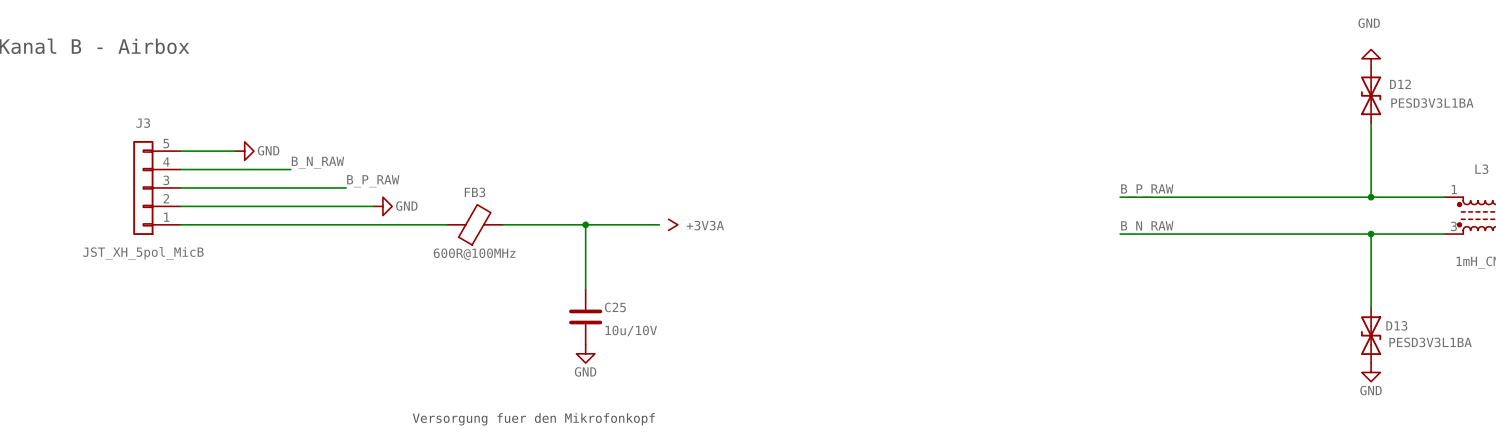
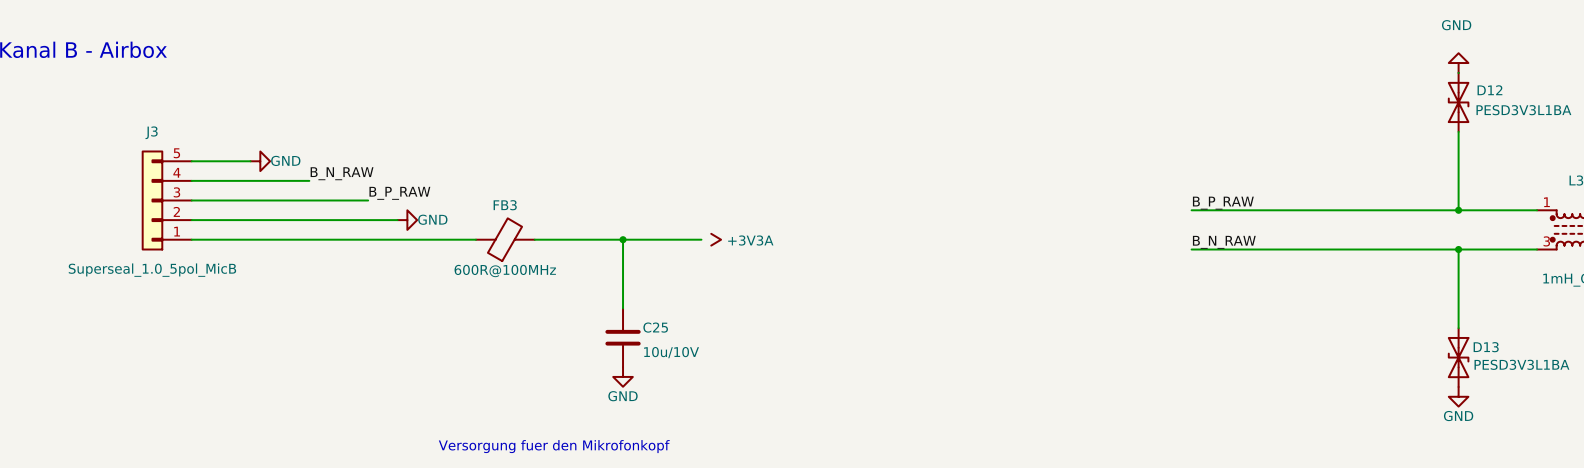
J3 value: JST_XH_5pol_MicB (143, 253) -> Superseal_1.0_5pol_MicB (152, 270)

